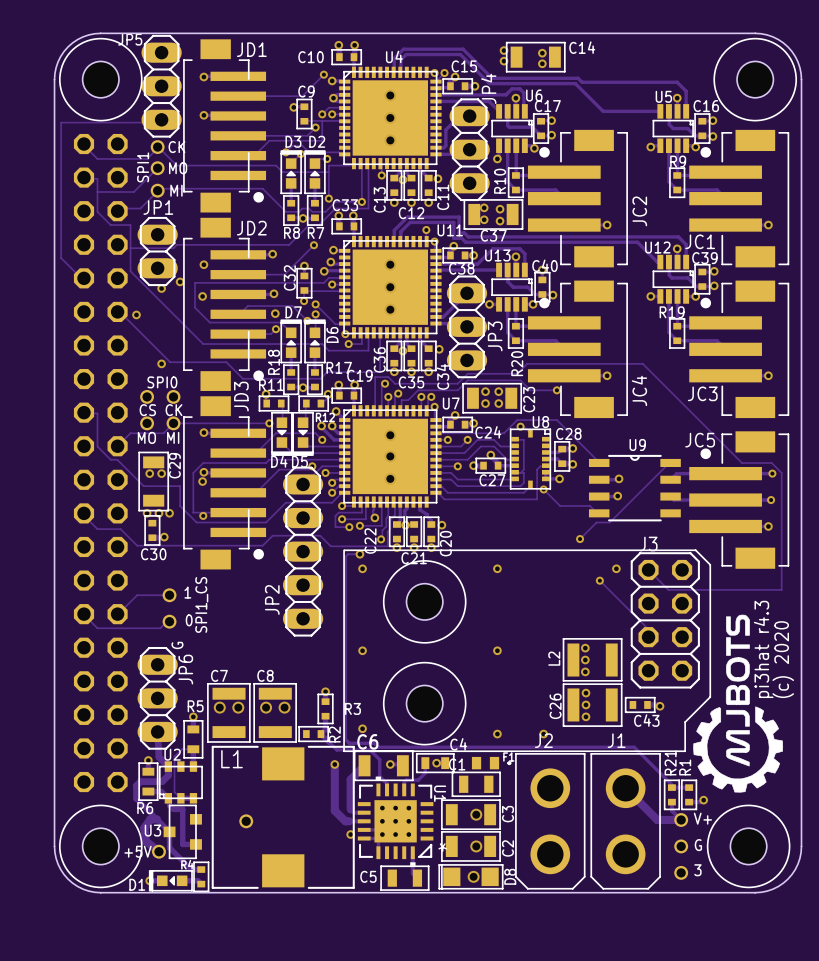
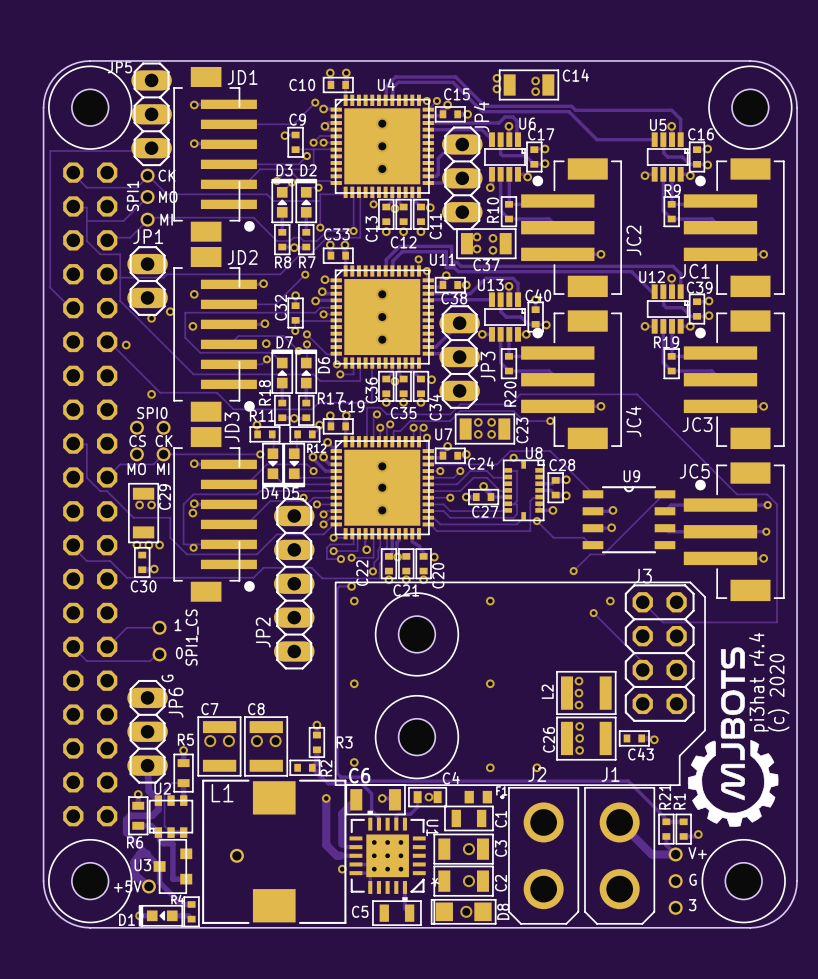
text: pi3hat r4.3 (763, 649) -> pi3hat r4.4 (758, 682)
C1 name rotation: 0° (457, 764) -> 90° counterclockwise (500, 819)
C1 name position: C1 (457, 764) -> C1 (500, 819)

